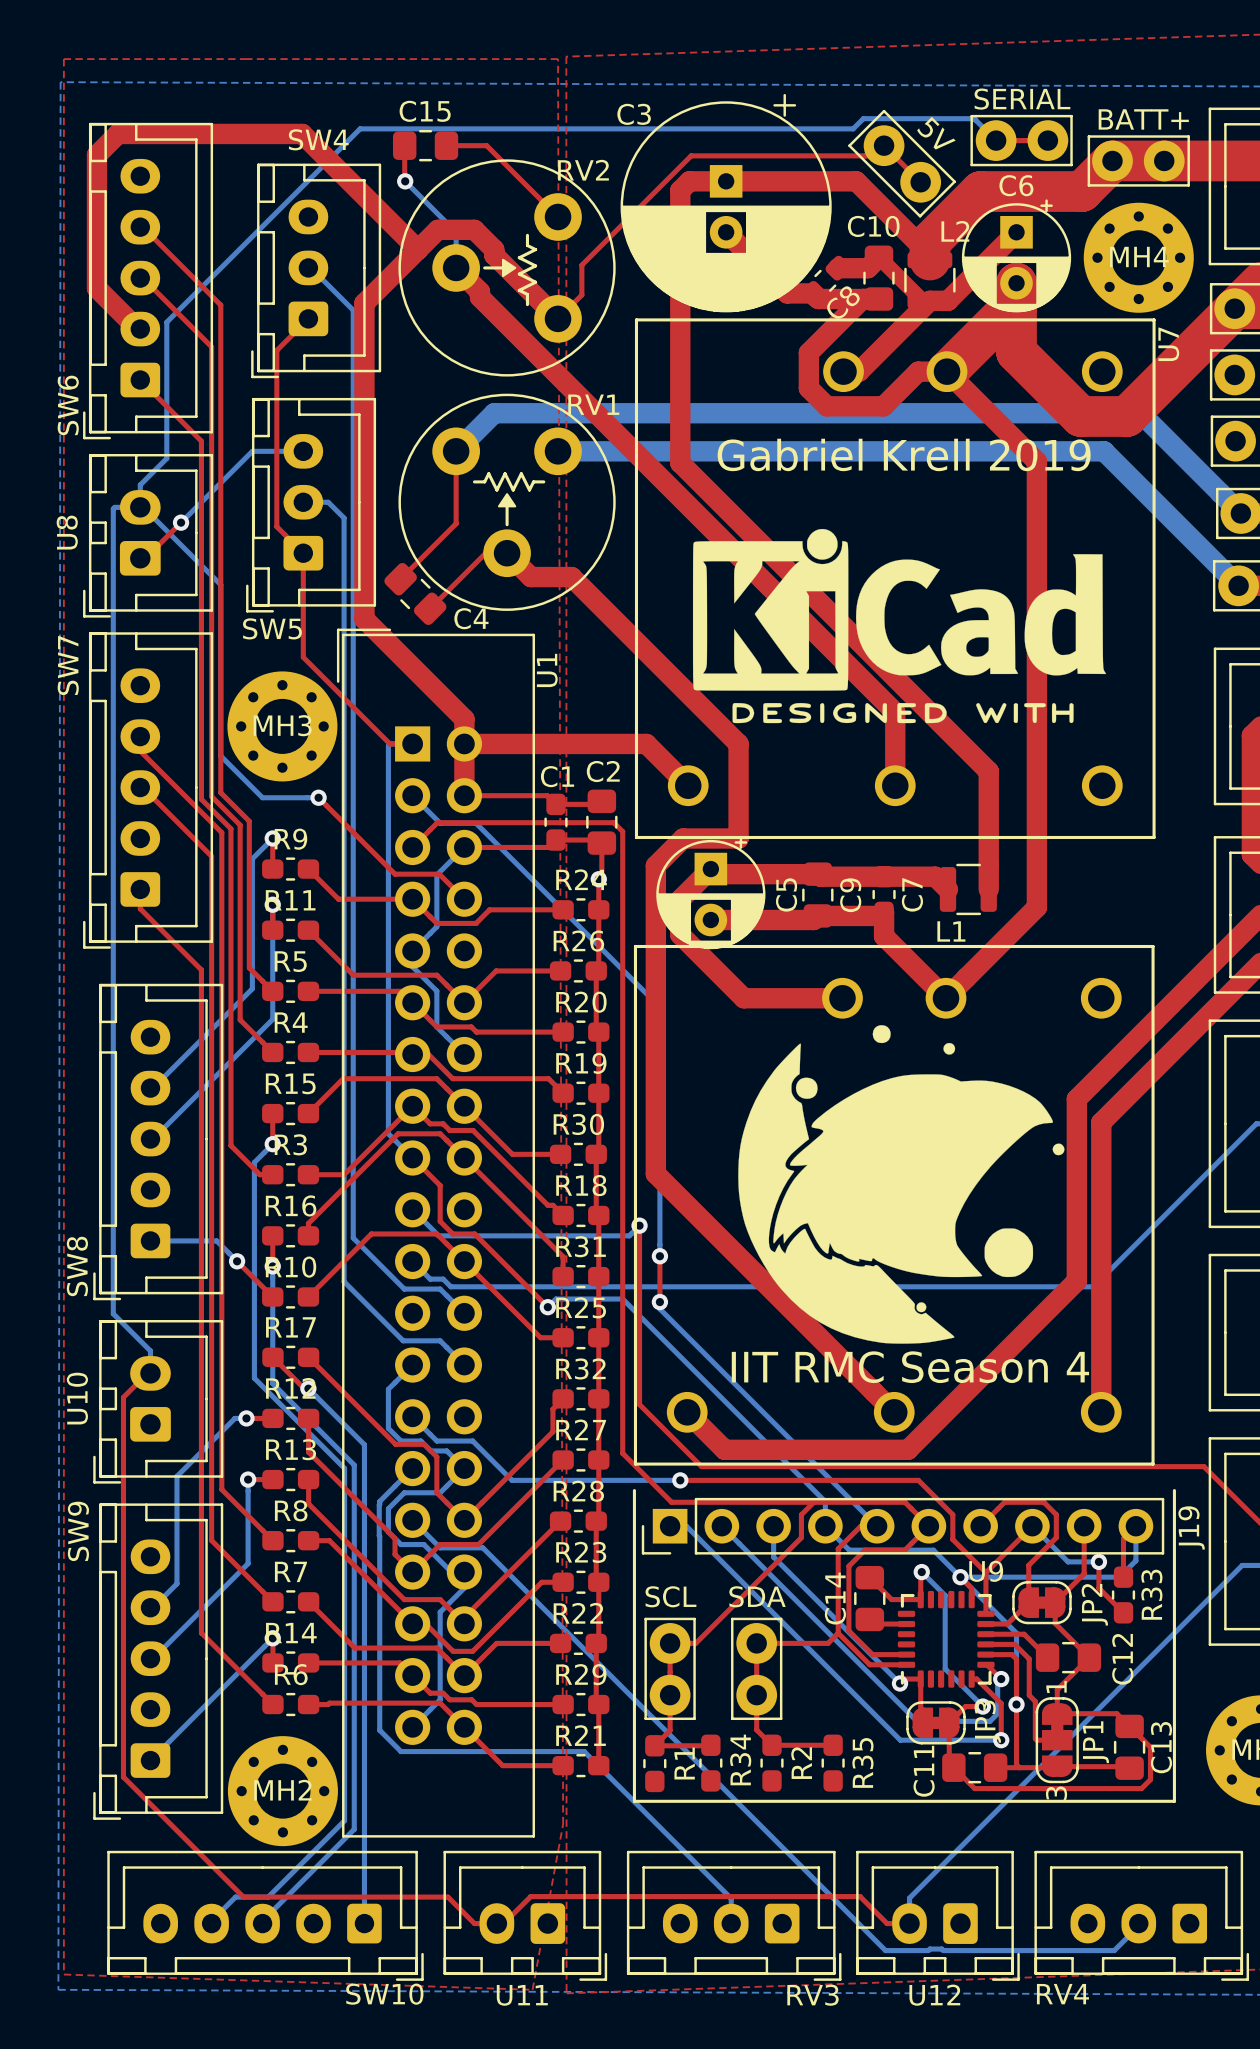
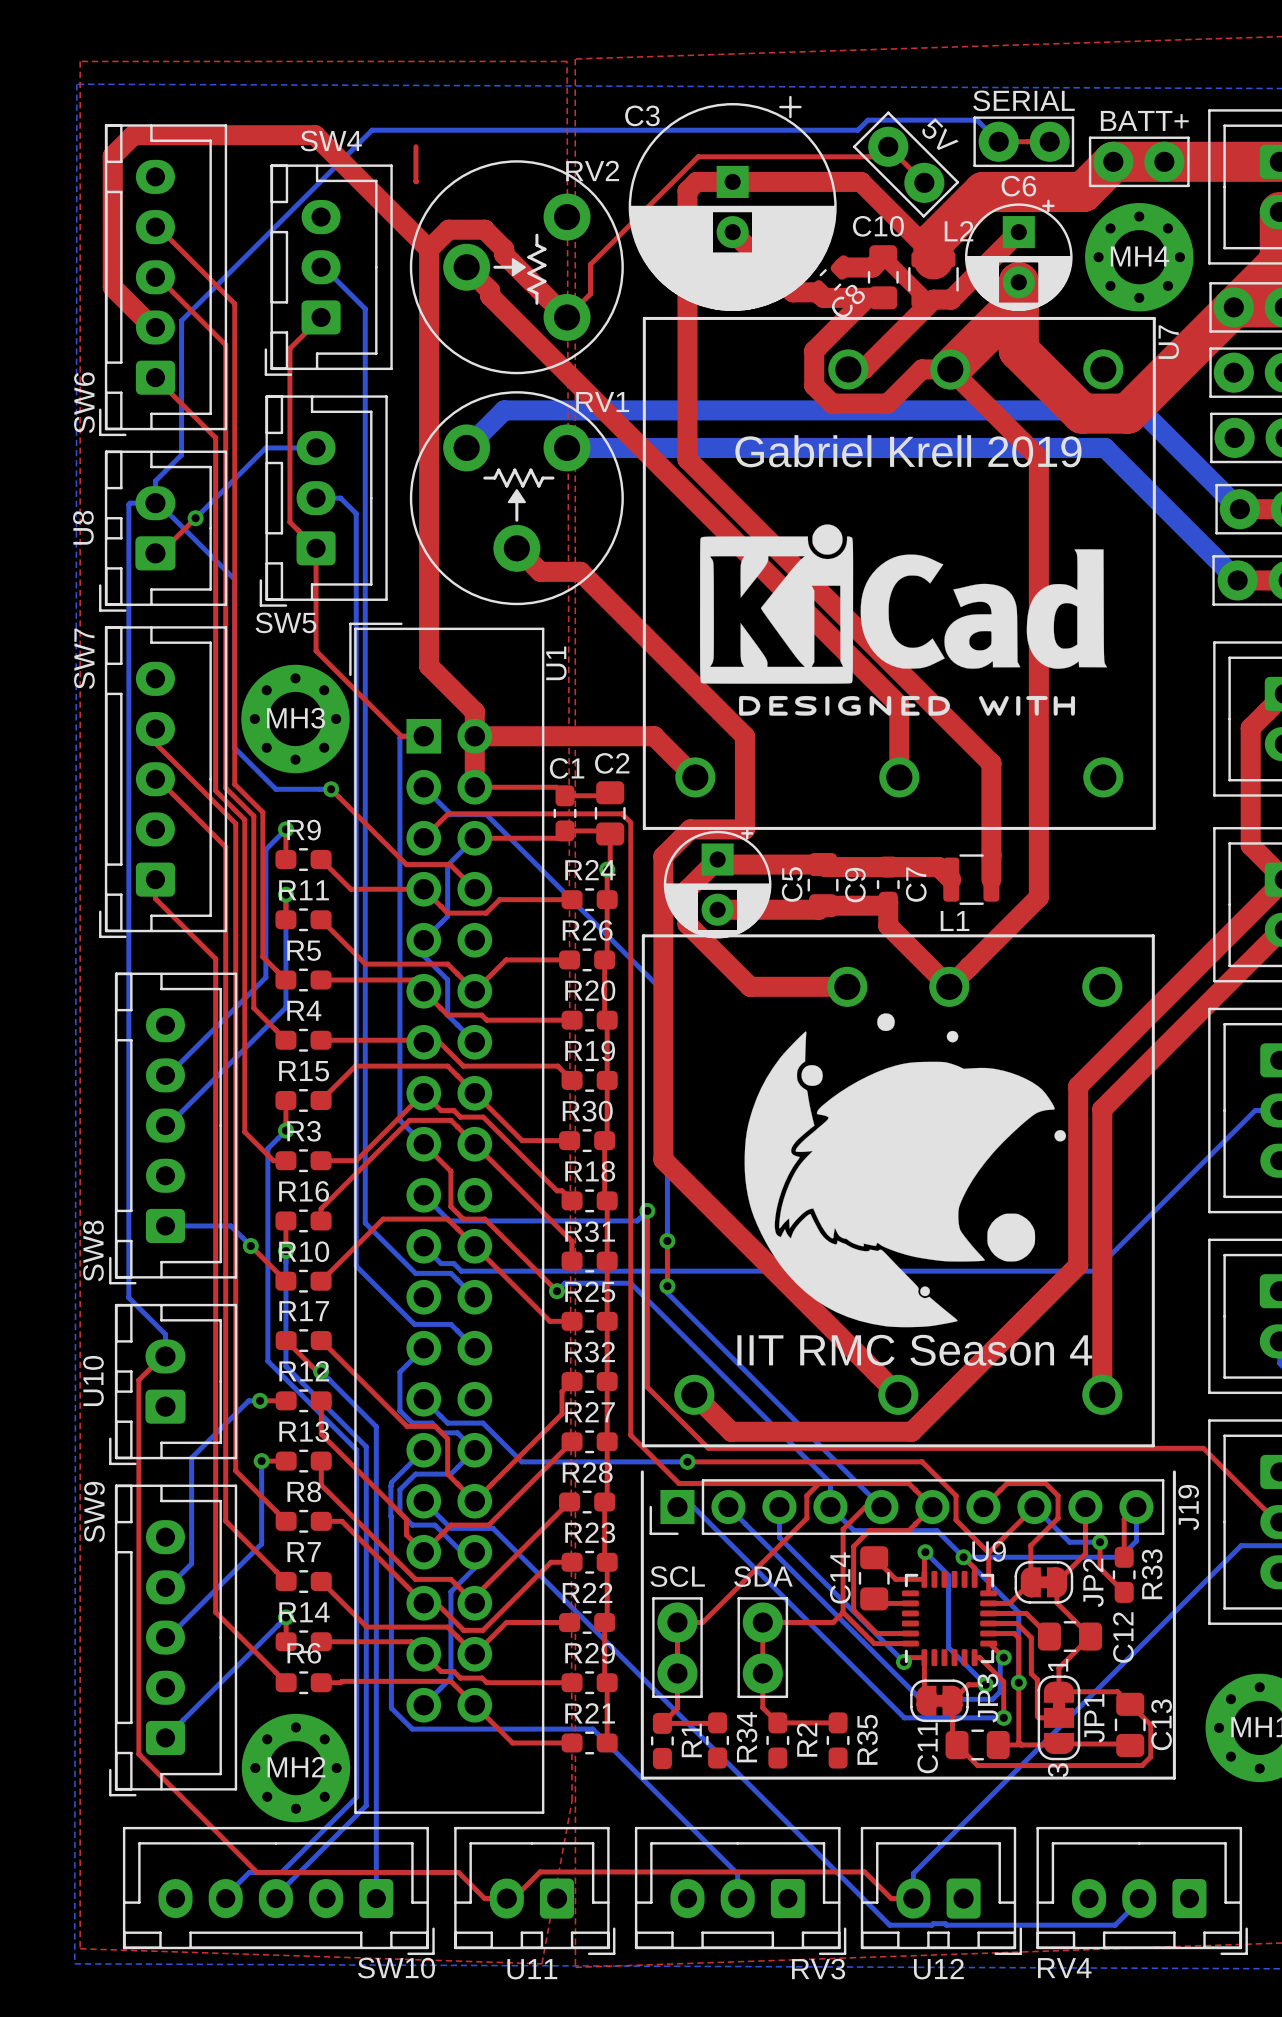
C15: (425, 145) -> none
top track: (446, 145) (486, 145) (558, 217) -> none
bottom track: (405, 181) (456, 232) (456, 267) -> none
via: (405, 181) -> none
top track: (418, 249) (364, 303) (364, 619) (418, 672) -> (429, 249) (429, 666)
top track: (456, 451) (456, 523) (400, 579) -> none
top track: (507, 553) (485, 553) (430, 608) -> none
C4: (415, 593) -> none

